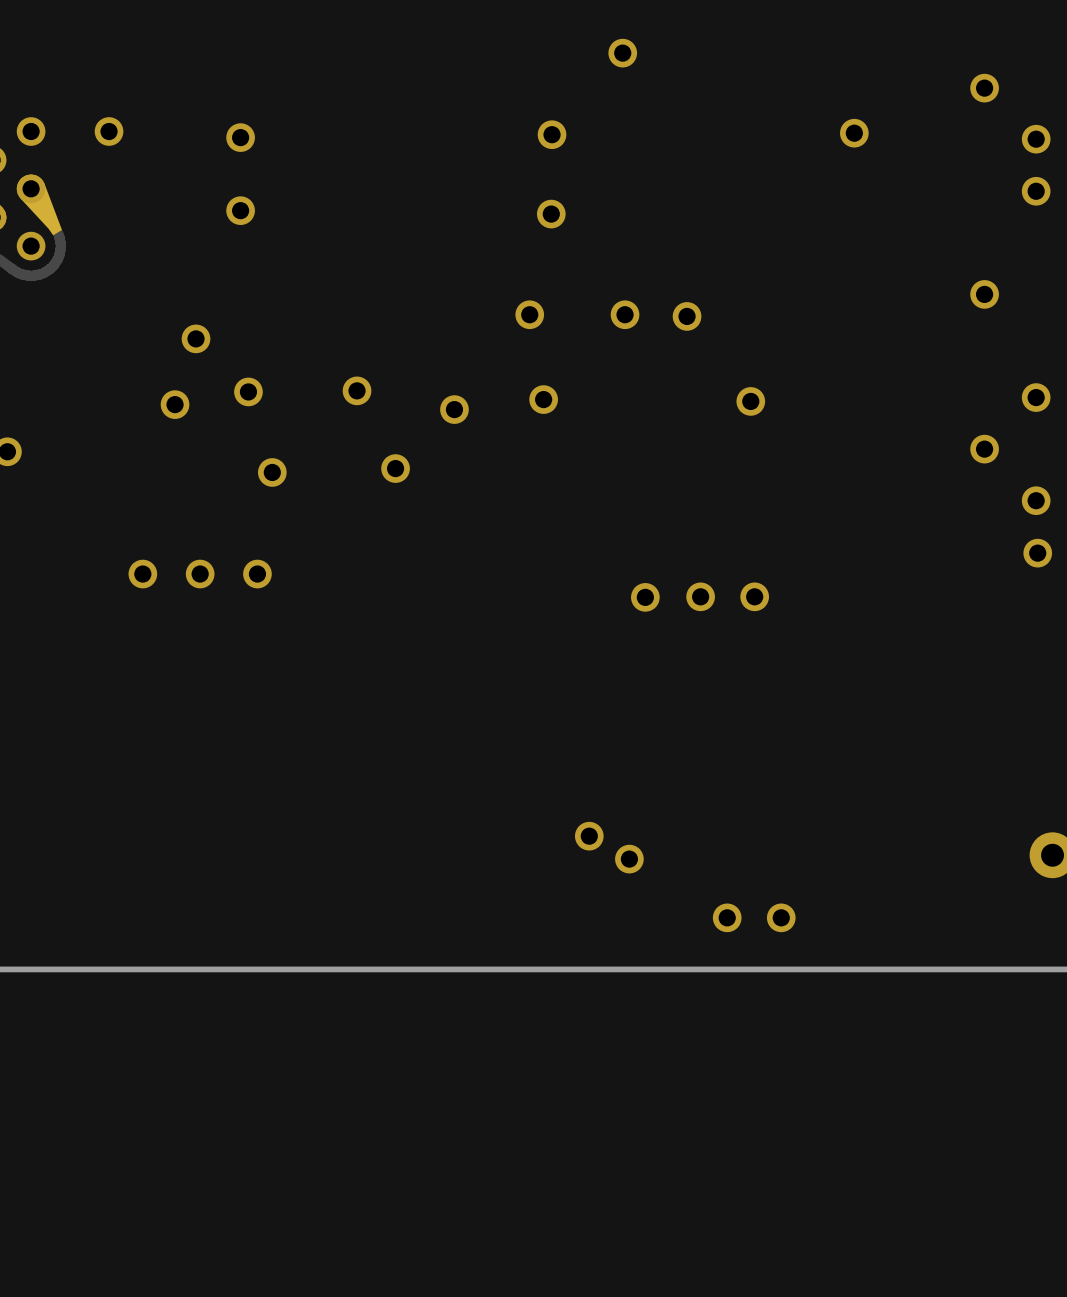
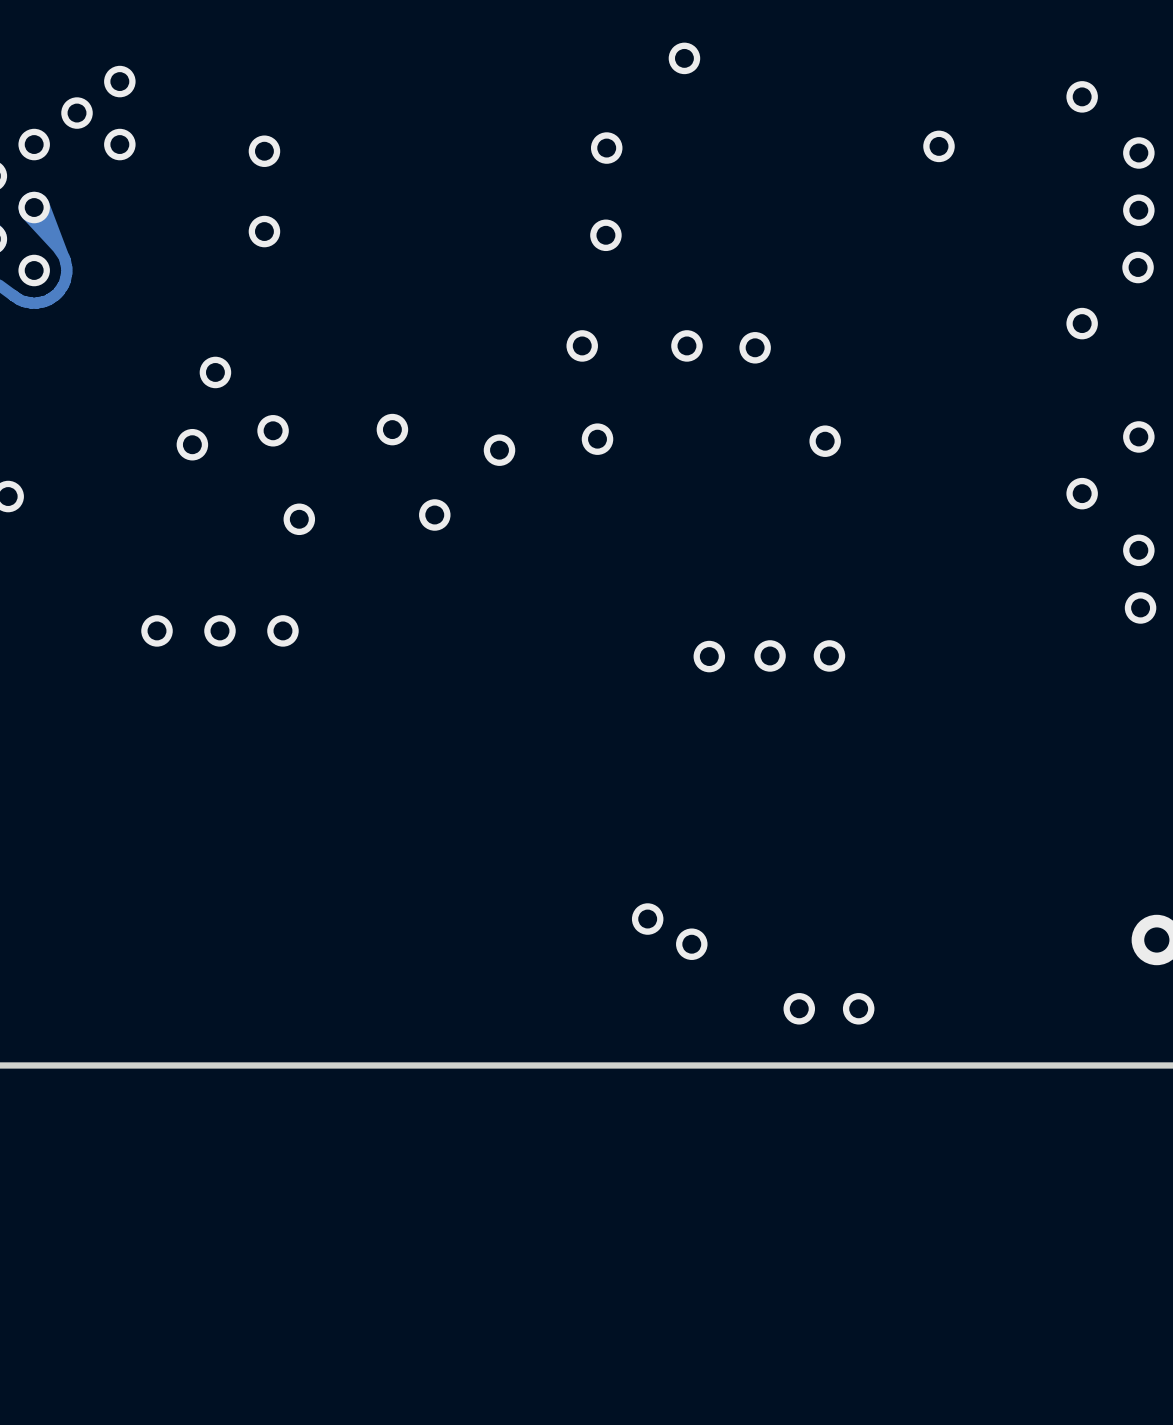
via: none -> (119, 81)
via: none -> (77, 113)
via: none -> (1138, 267)

